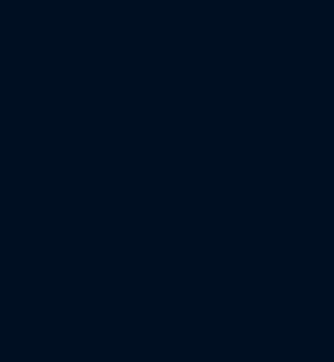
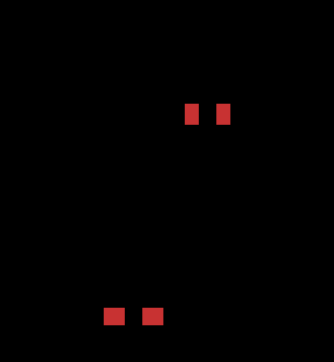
part: none -> (207, 114)
part: none -> (133, 316)

